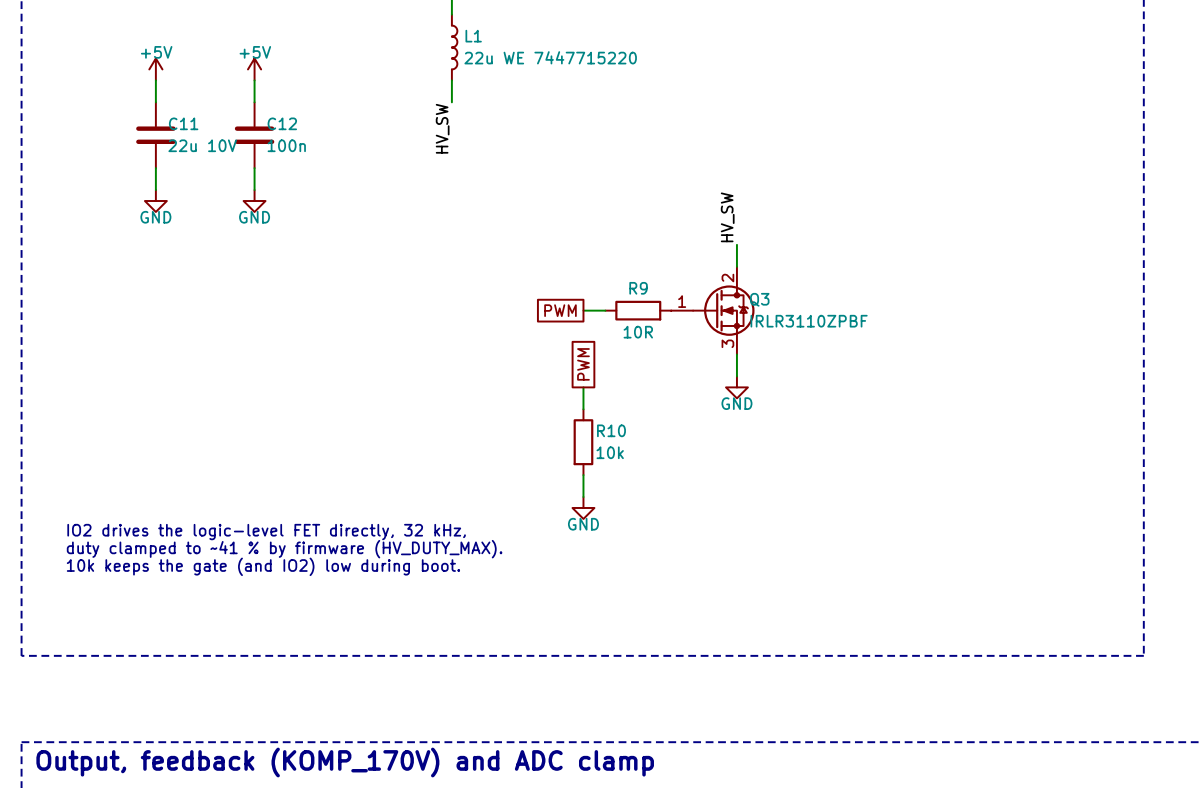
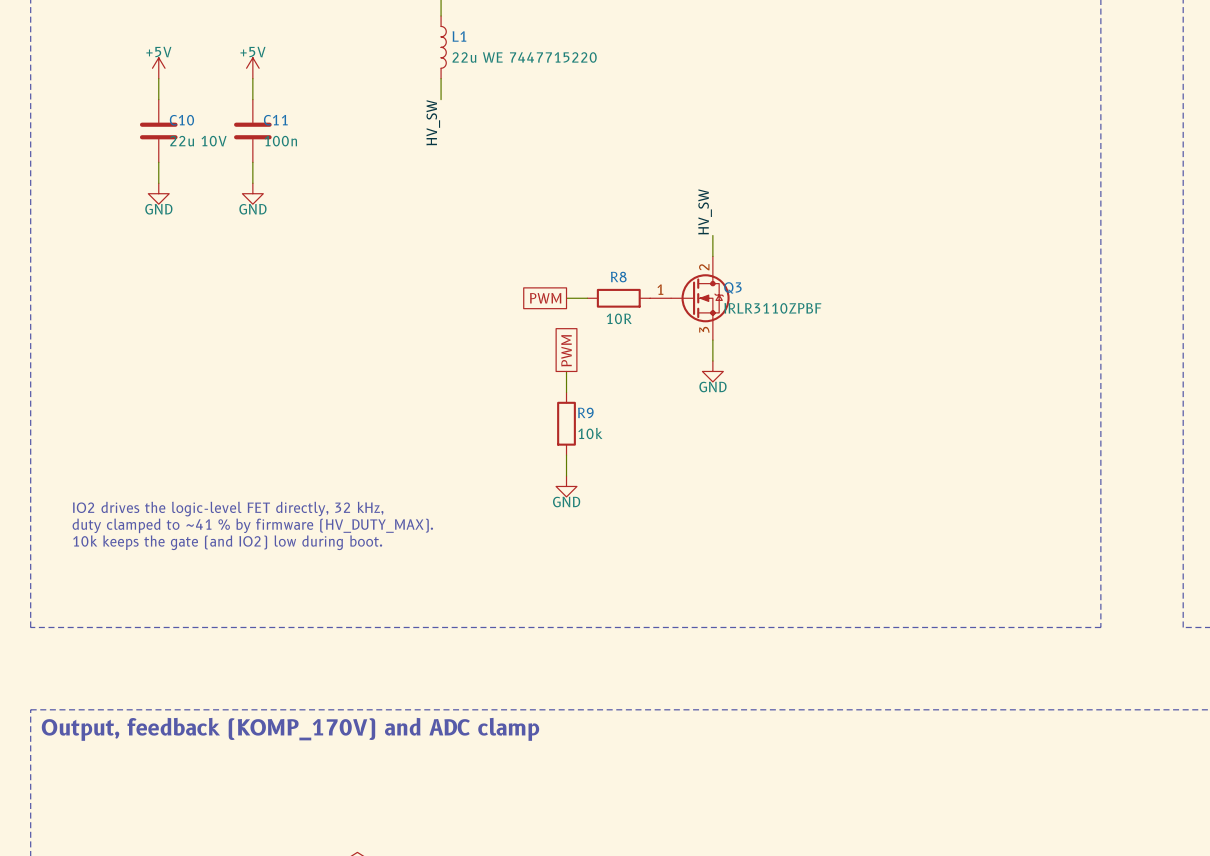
C11 name: C11 (183, 123) -> C10 (181, 120)
C12 name: C12 (282, 123) -> C11 (275, 120)
R9 name: R9 (638, 288) -> R8 (618, 277)
R10 name: R10 (611, 430) -> R9 (585, 412)

